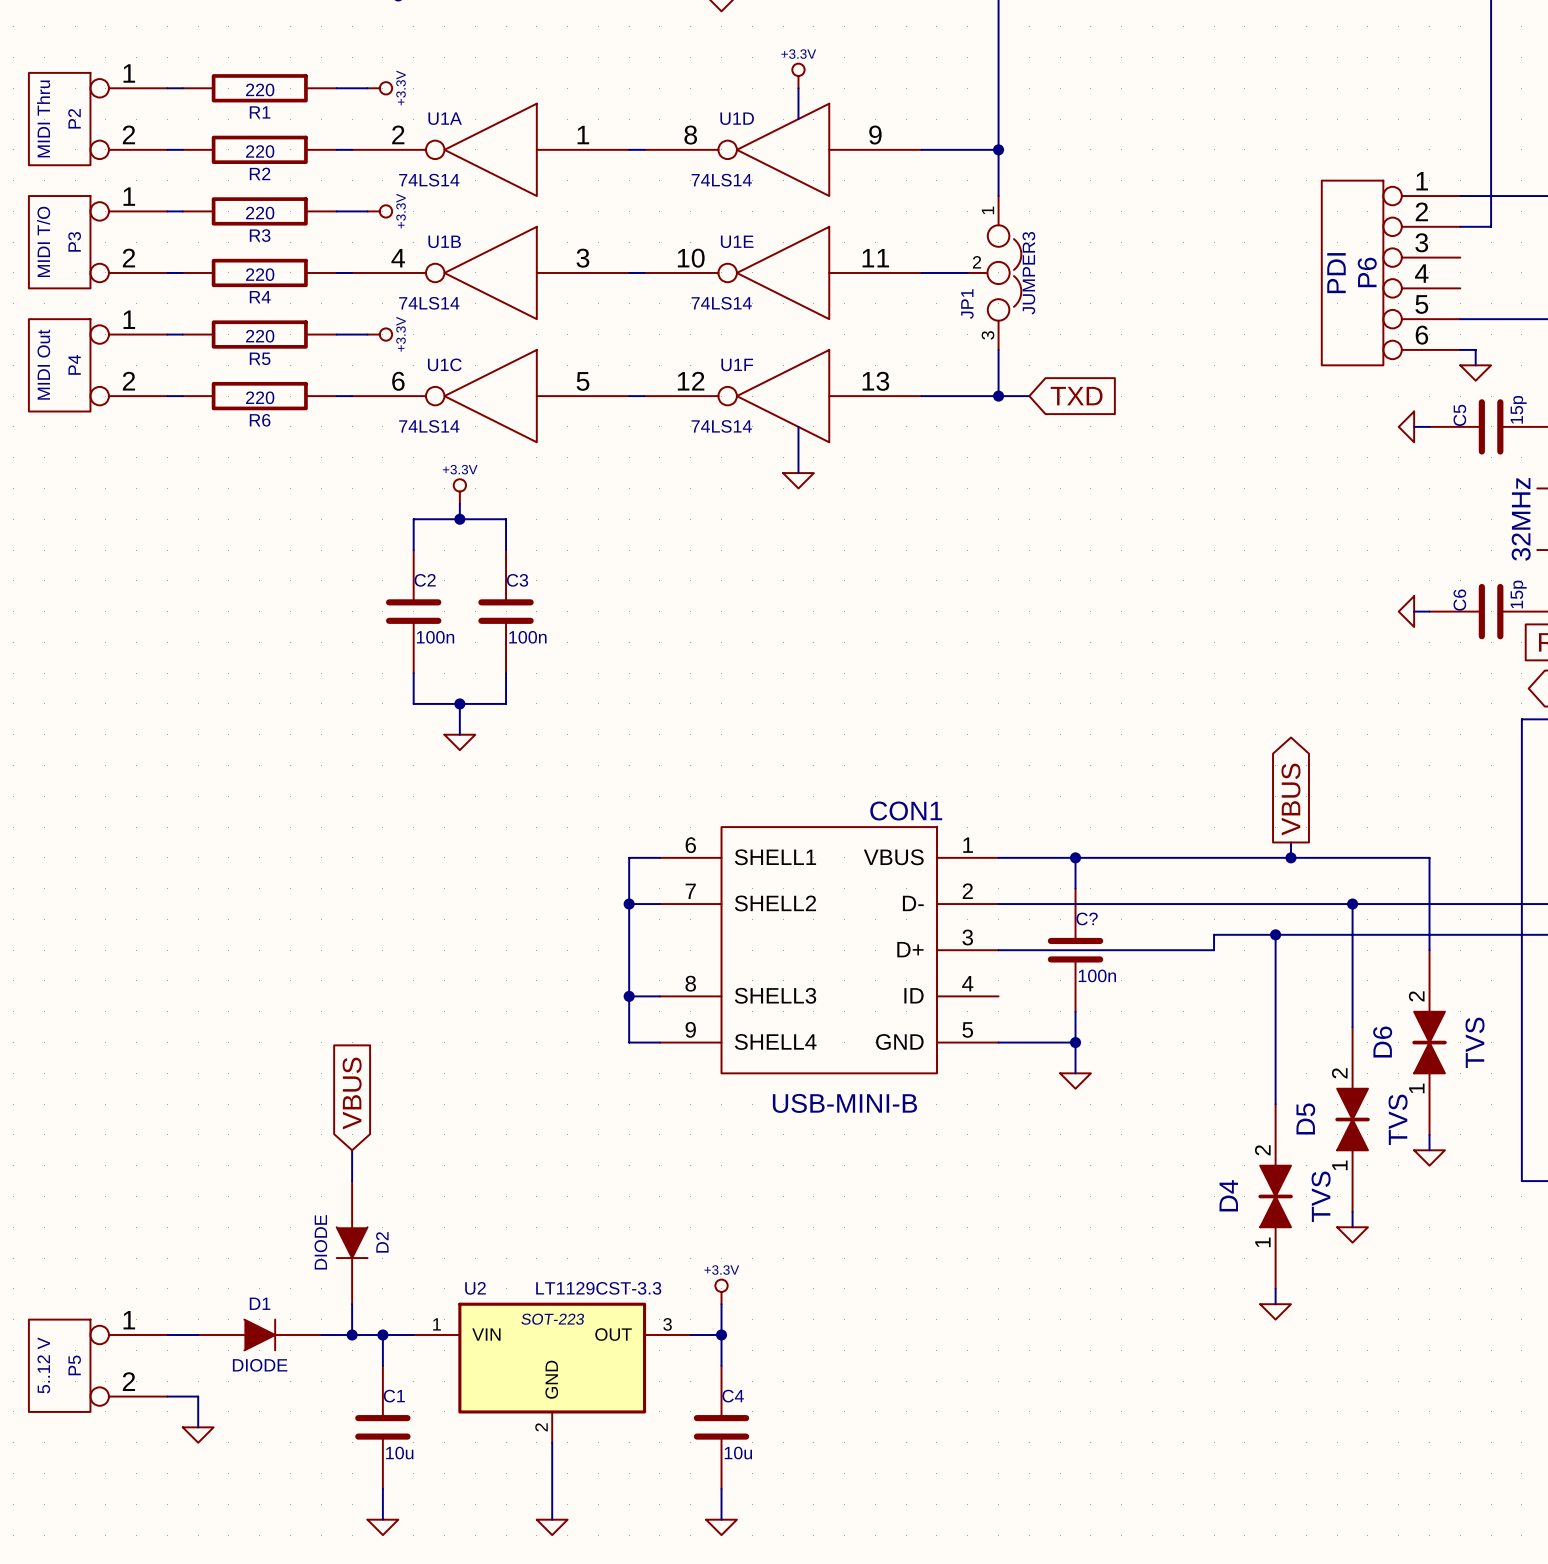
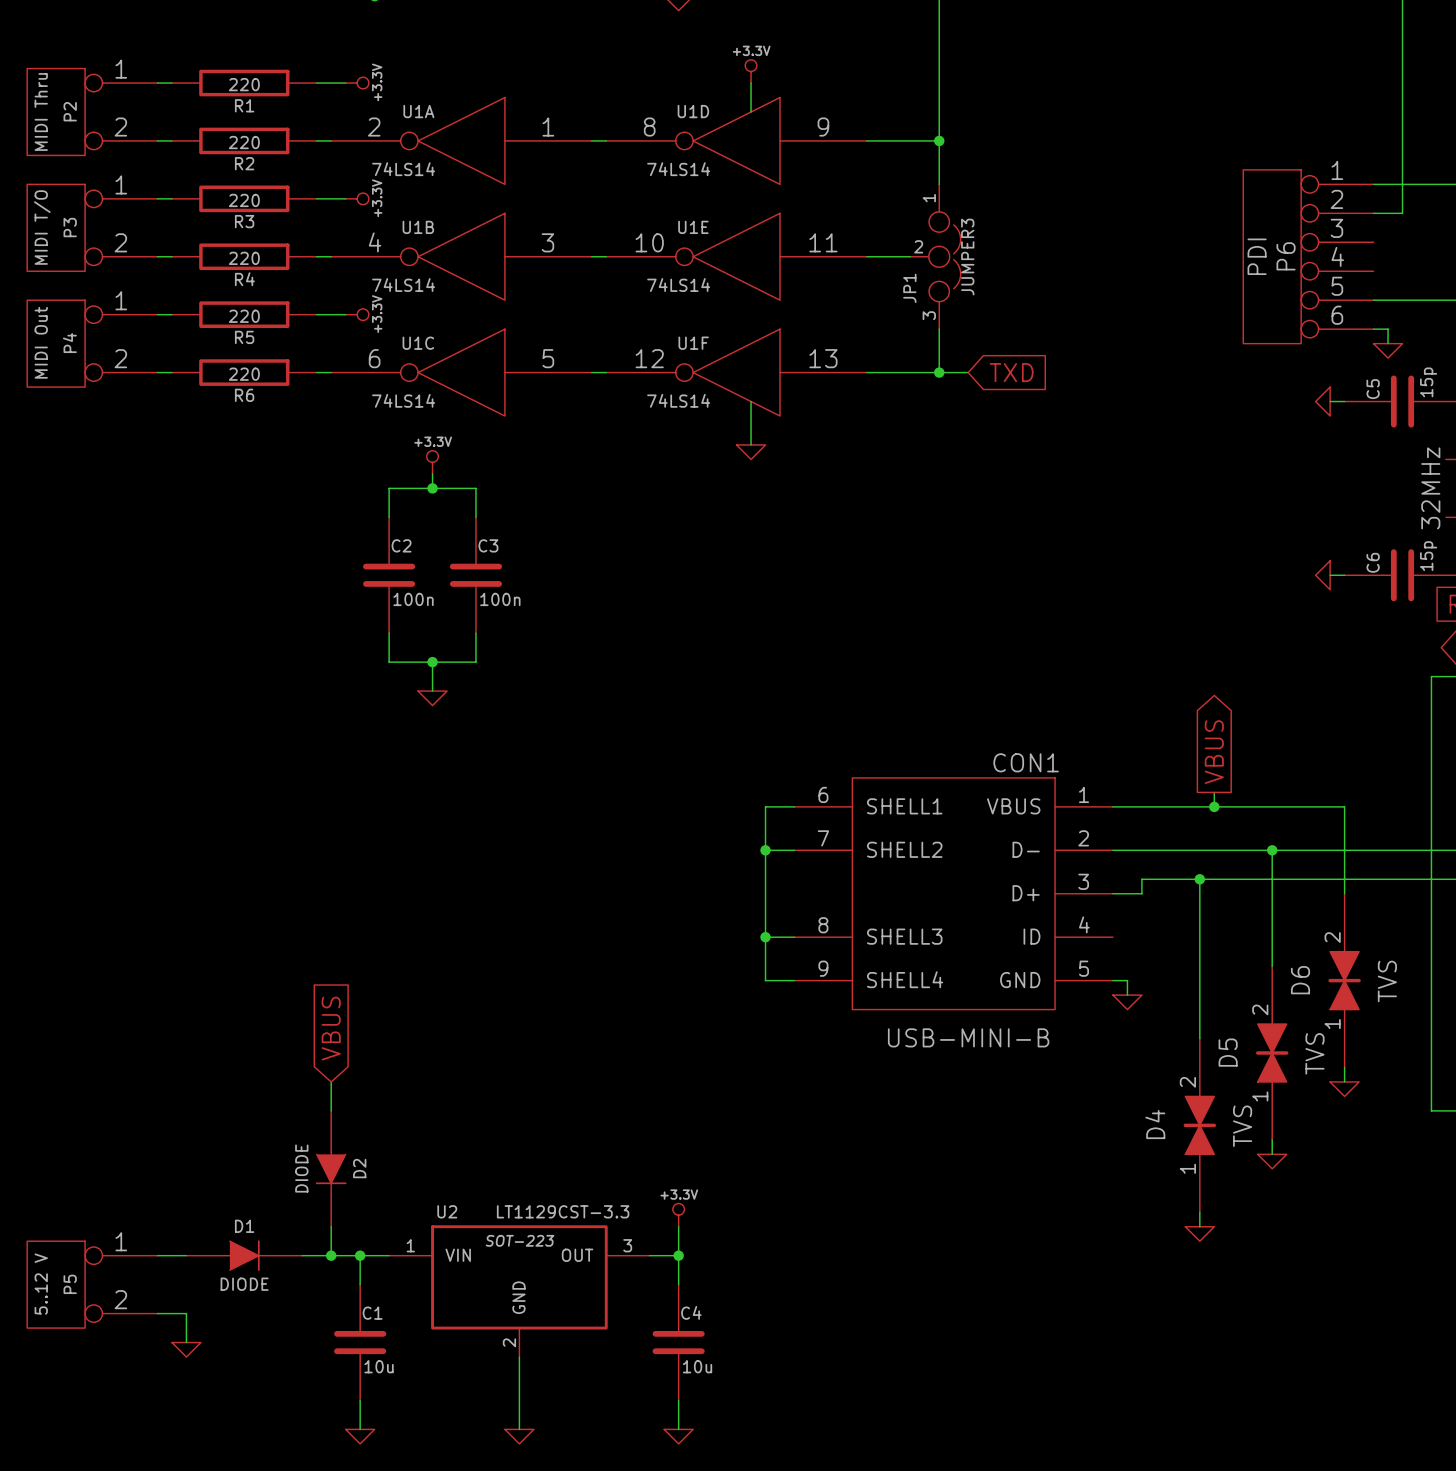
wire: (659, 857) (629, 857) (629, 1042) (659, 1042) -> (794, 806) (765, 806) (765, 980) (794, 980)
wire: (998, 857) (1183, 857) -> none
wire: (1075, 857) (1075, 888) -> none
junction: (1075, 857) -> none
wire: (629, 904) (659, 904) -> (765, 850) (794, 850)
junction: (629, 904) -> none
junction: none -> (765, 850)
wire: (998, 904) (1183, 904) -> none
CON1 position: (829, 950) -> (953, 893)
wire: (998, 950) (1183, 950) -> none
C?: 100n (1075, 950) -> none
wire: (629, 996) (659, 996) -> (765, 937) (794, 937)
junction: (629, 996) -> none
junction: none -> (765, 937)
wire: (1075, 1011) (1075, 1073) -> none
wire: (998, 1042) (1075, 1042) -> none
junction: (1075, 1042) -> none
wire: none -> (1112, 980) (1127, 980) (1127, 995)
power symbol position: (1075, 1081) -> (1127, 1002)

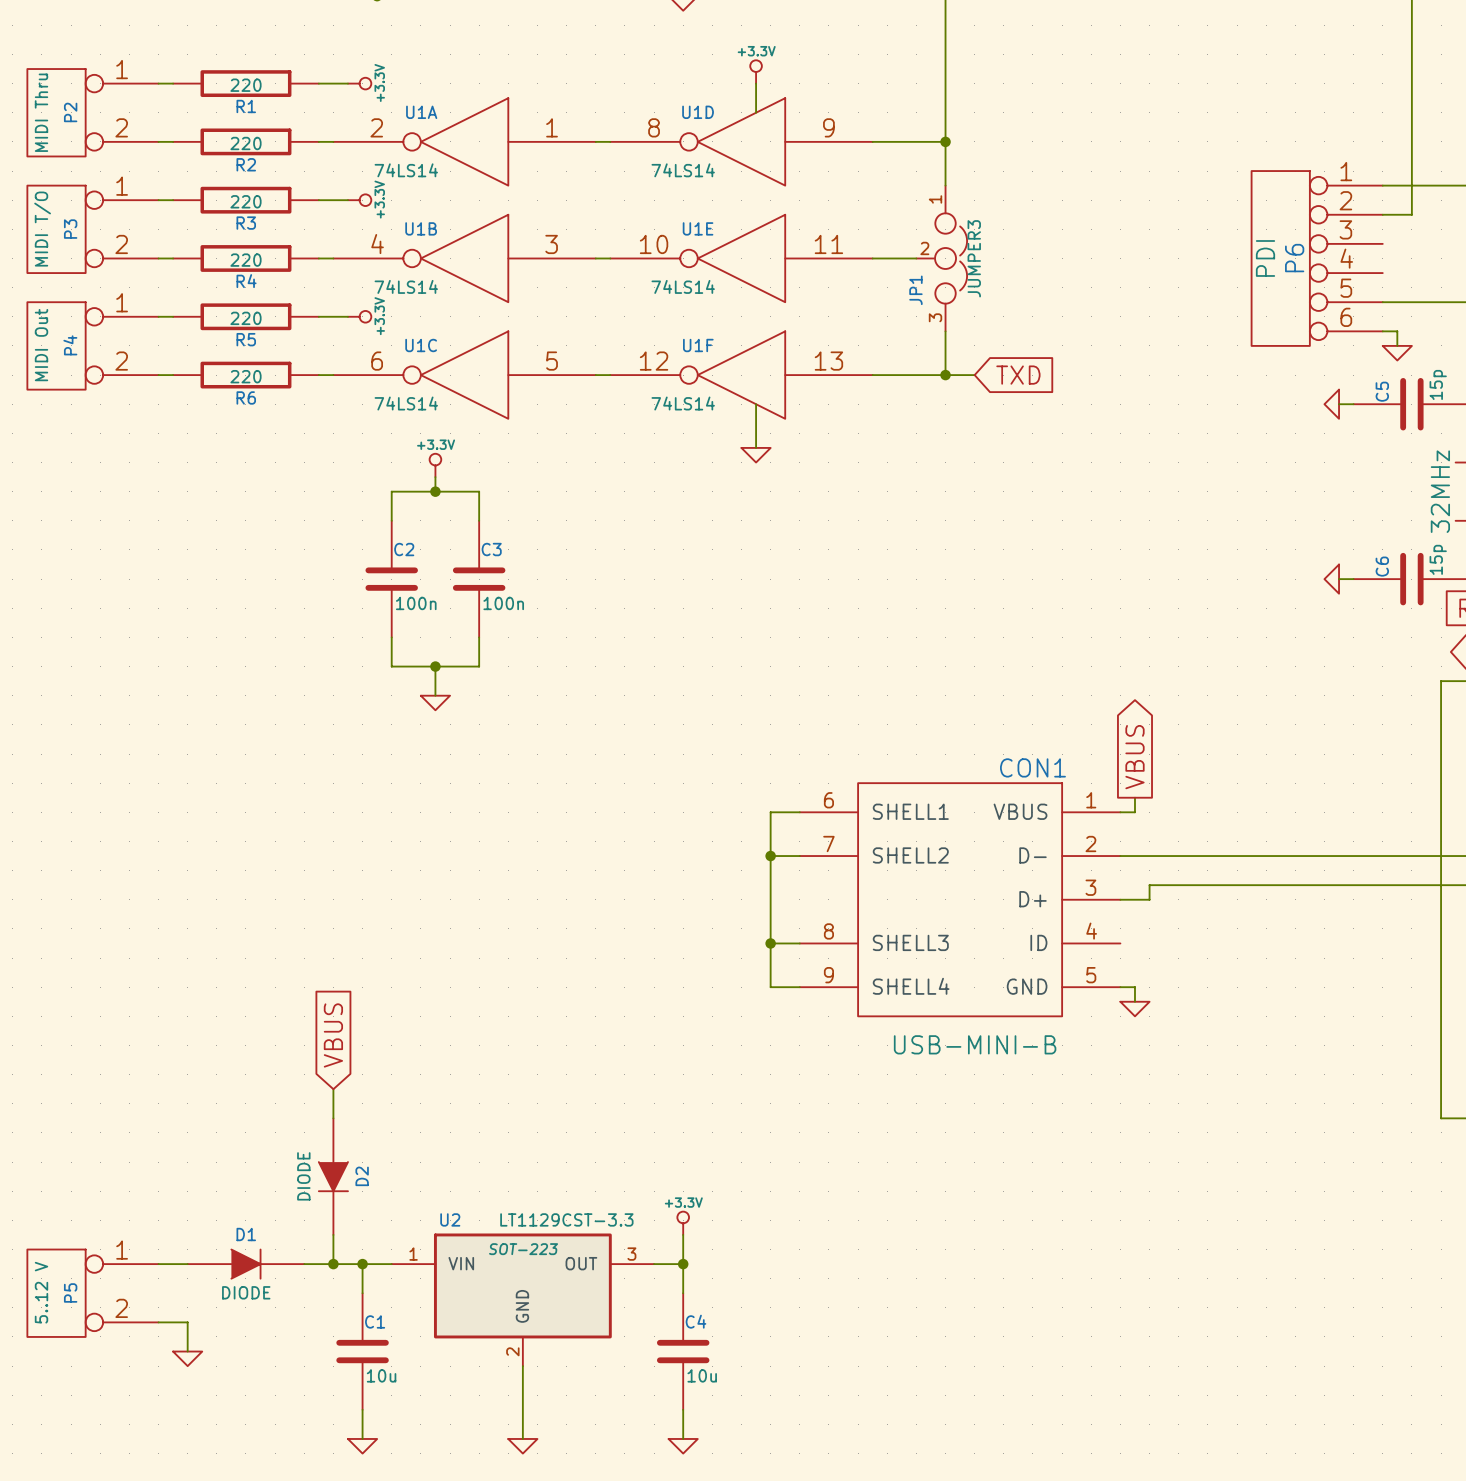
global label position: VBUS (1214, 752) -> VBUS (1134, 757)
wire: (1214, 792) (1214, 806) -> none
wire: (1127, 806) (1344, 806) (1344, 893) -> (1134, 812) (1134, 797)
junction: (1214, 806) -> none
wire: (1272, 850) (1272, 966) -> none
junction: (1272, 850) -> none
wire: (1199, 879) (1199, 1038) -> none
junction: (1199, 879) -> none
D6: TVS (1344, 980) -> none
D5: TVS (1272, 1053) -> none
wire: (1344, 1067) (1344, 1081) -> none
power symbol: (1344, 1089) -> none
D4: TVS (1199, 1125) -> none
wire: (1272, 1139) (1272, 1154) -> none
power symbol: (1272, 1161) -> none
wire: (1199, 1212) (1199, 1226) -> none
power symbol: (1199, 1233) -> none

